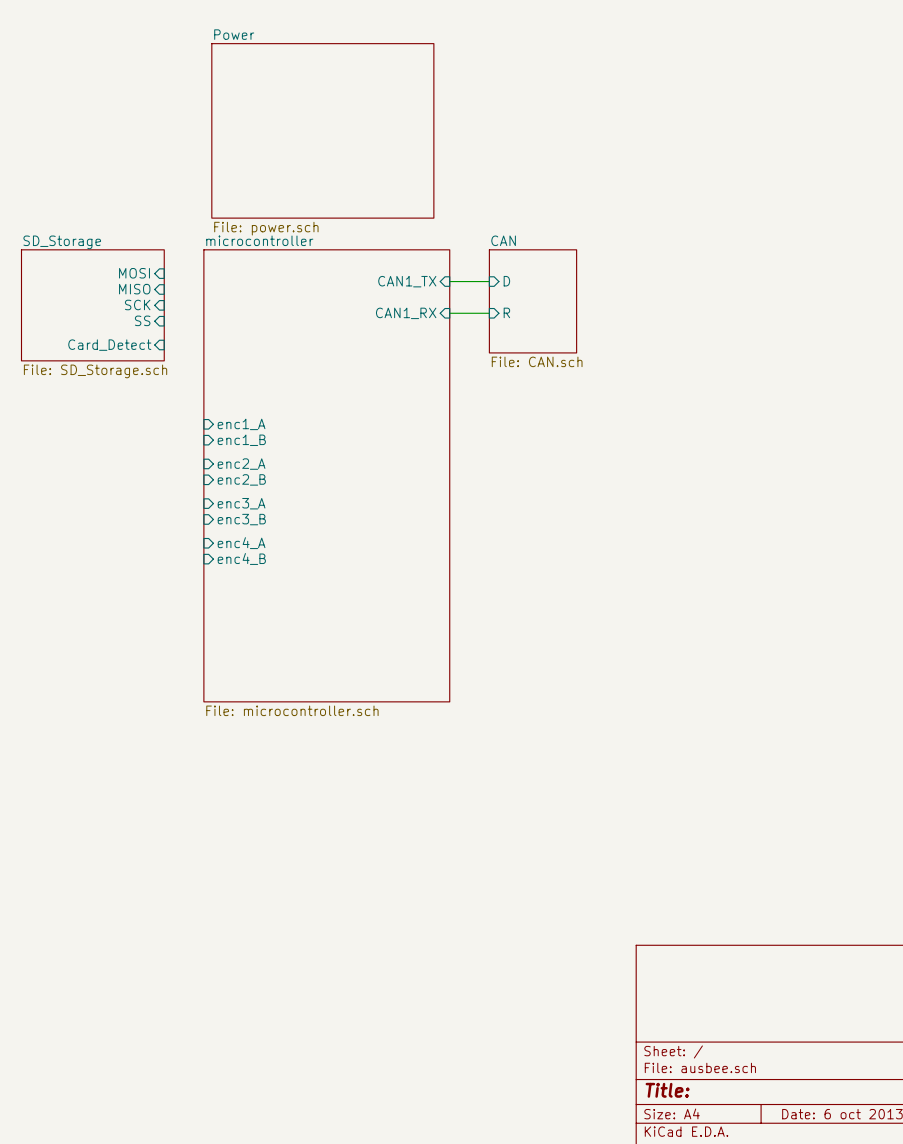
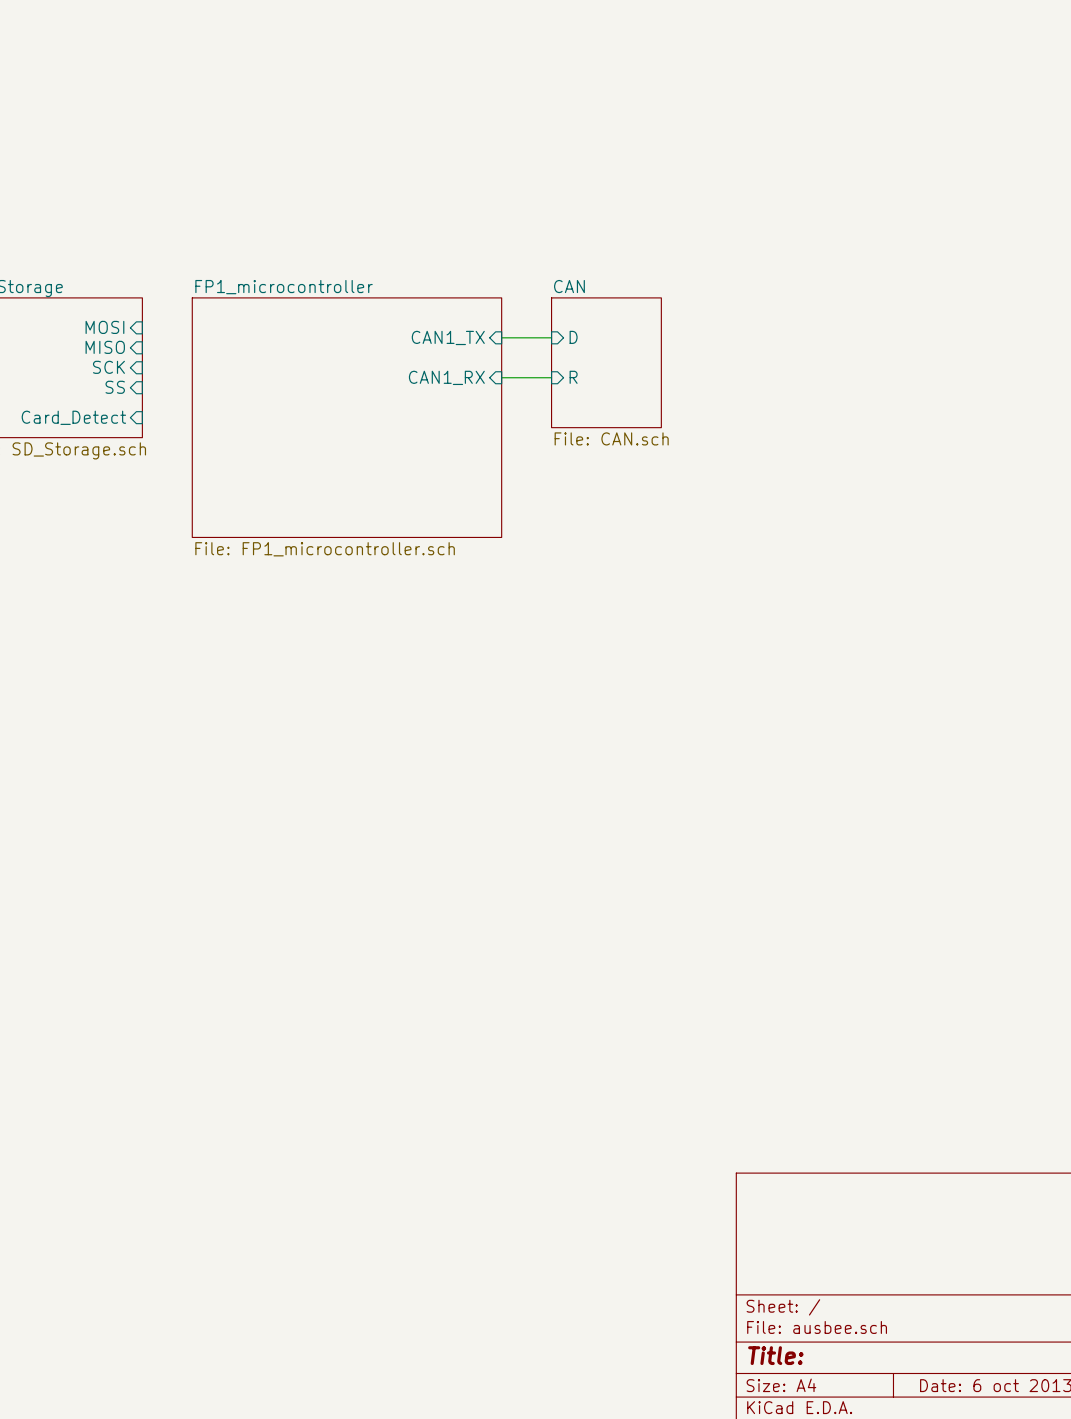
sheet Power: File: power.sch (322, 130) -> none
sheet FP1_microcontroller: none -> File: FP1_microcontroller.sch (346, 417)
sheet pin: enc1_A (241, 424) -> none
sheet pin: enc1_B (241, 440) -> none
sheet pin: enc2_A (241, 464) -> none
sheet microcontroller: File: microcontroller.sch (326, 475) -> none
sheet pin: enc2_B (241, 479) -> none
sheet pin: enc3_A (241, 503) -> none
sheet pin: enc3_B (241, 519) -> none
sheet pin: enc4_A (241, 543) -> none
sheet pin: enc4_B (241, 558) -> none

